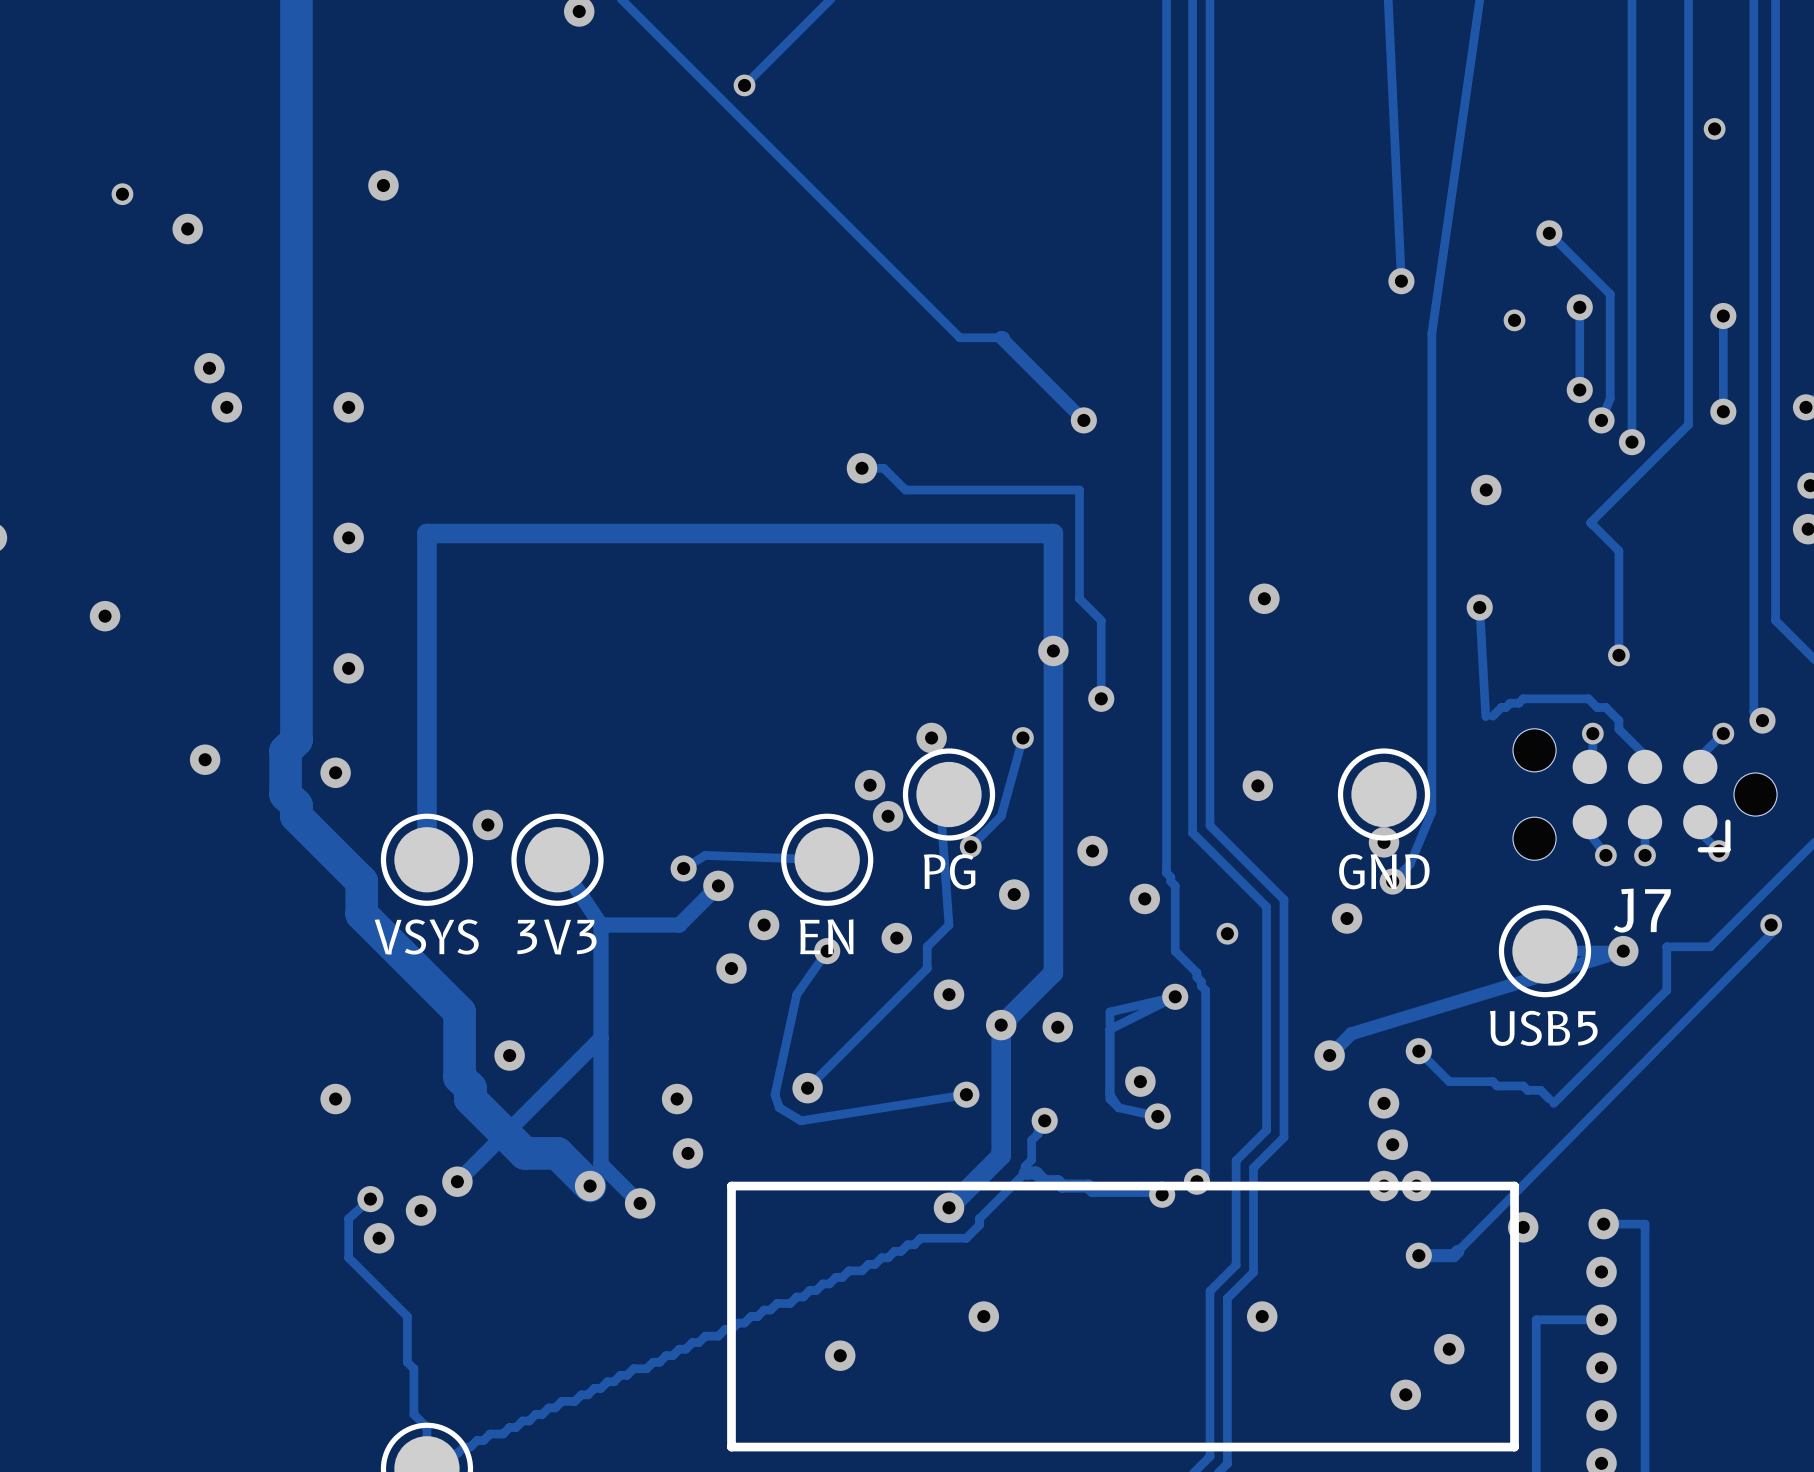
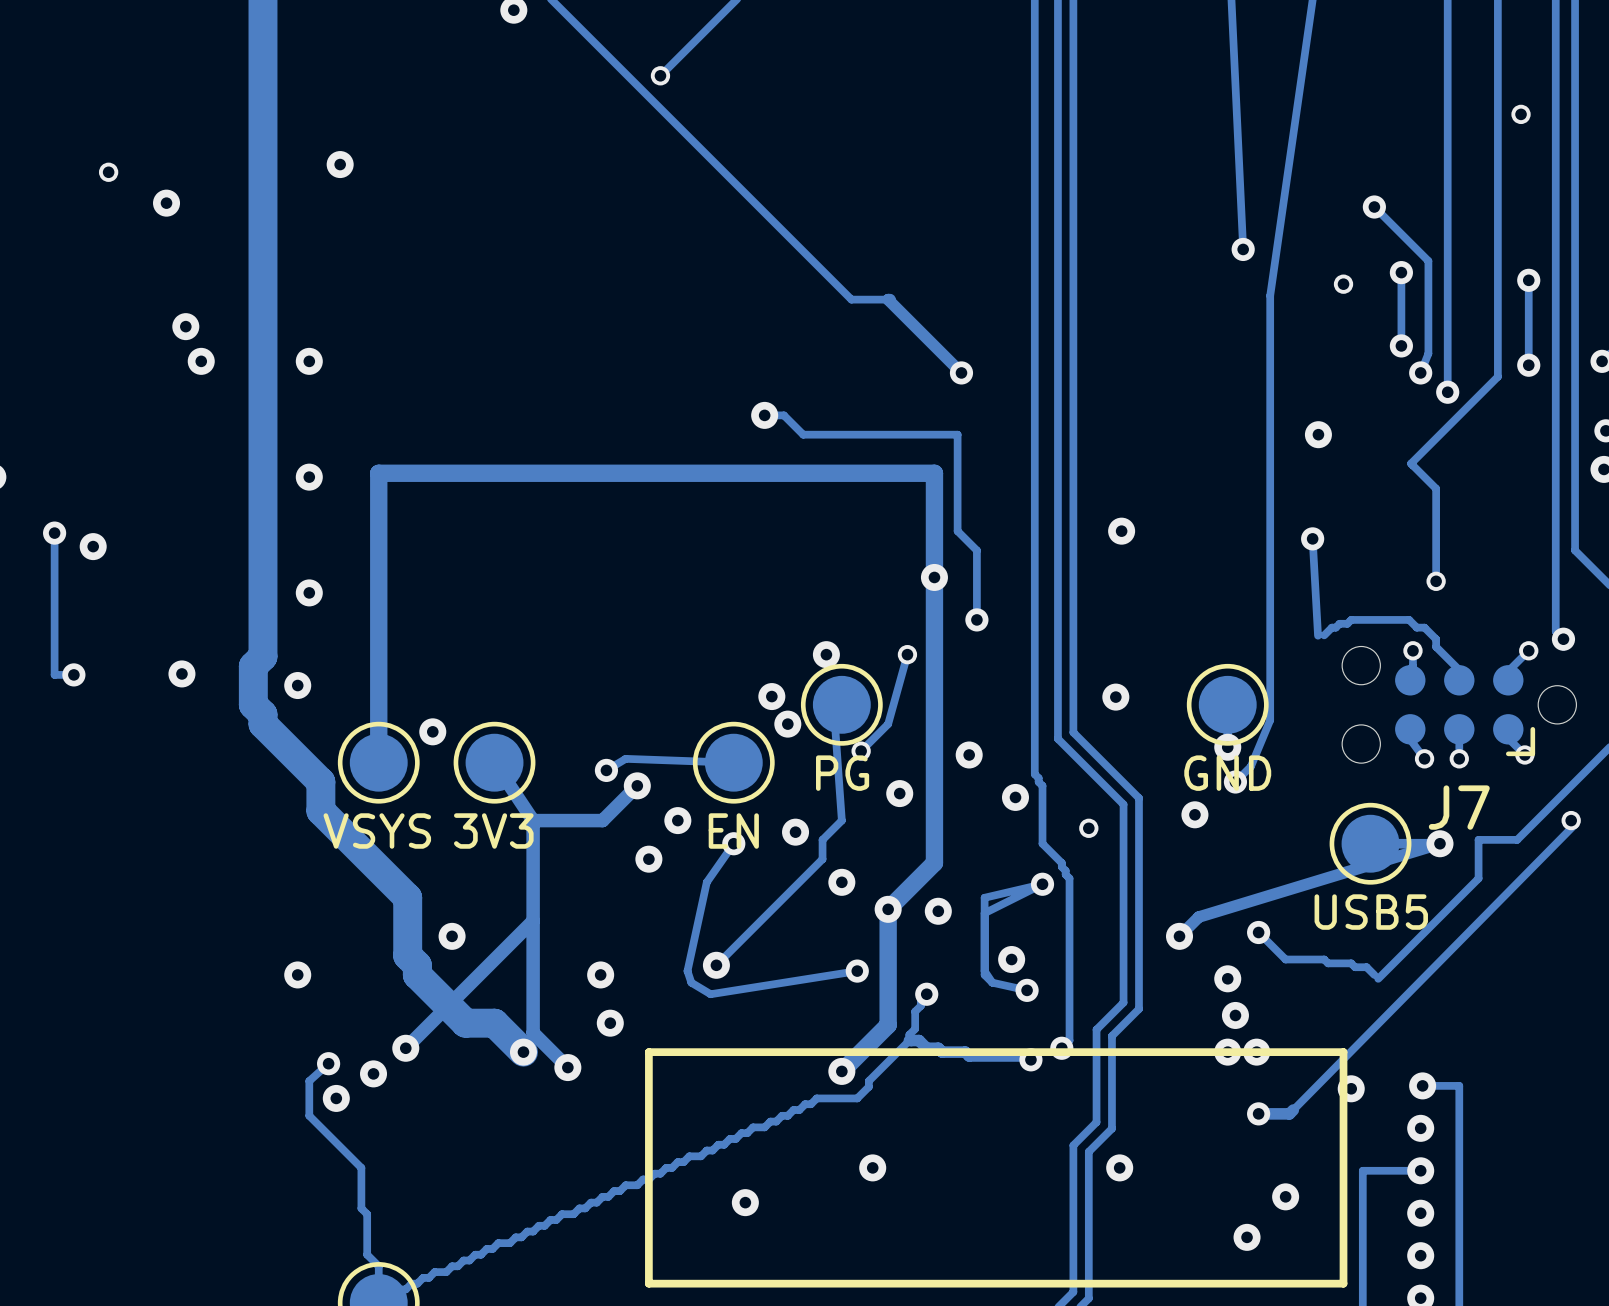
track: none -> (54, 533) (54, 674) (73, 674)
via: none -> (54, 533)
via: none -> (73, 674)

